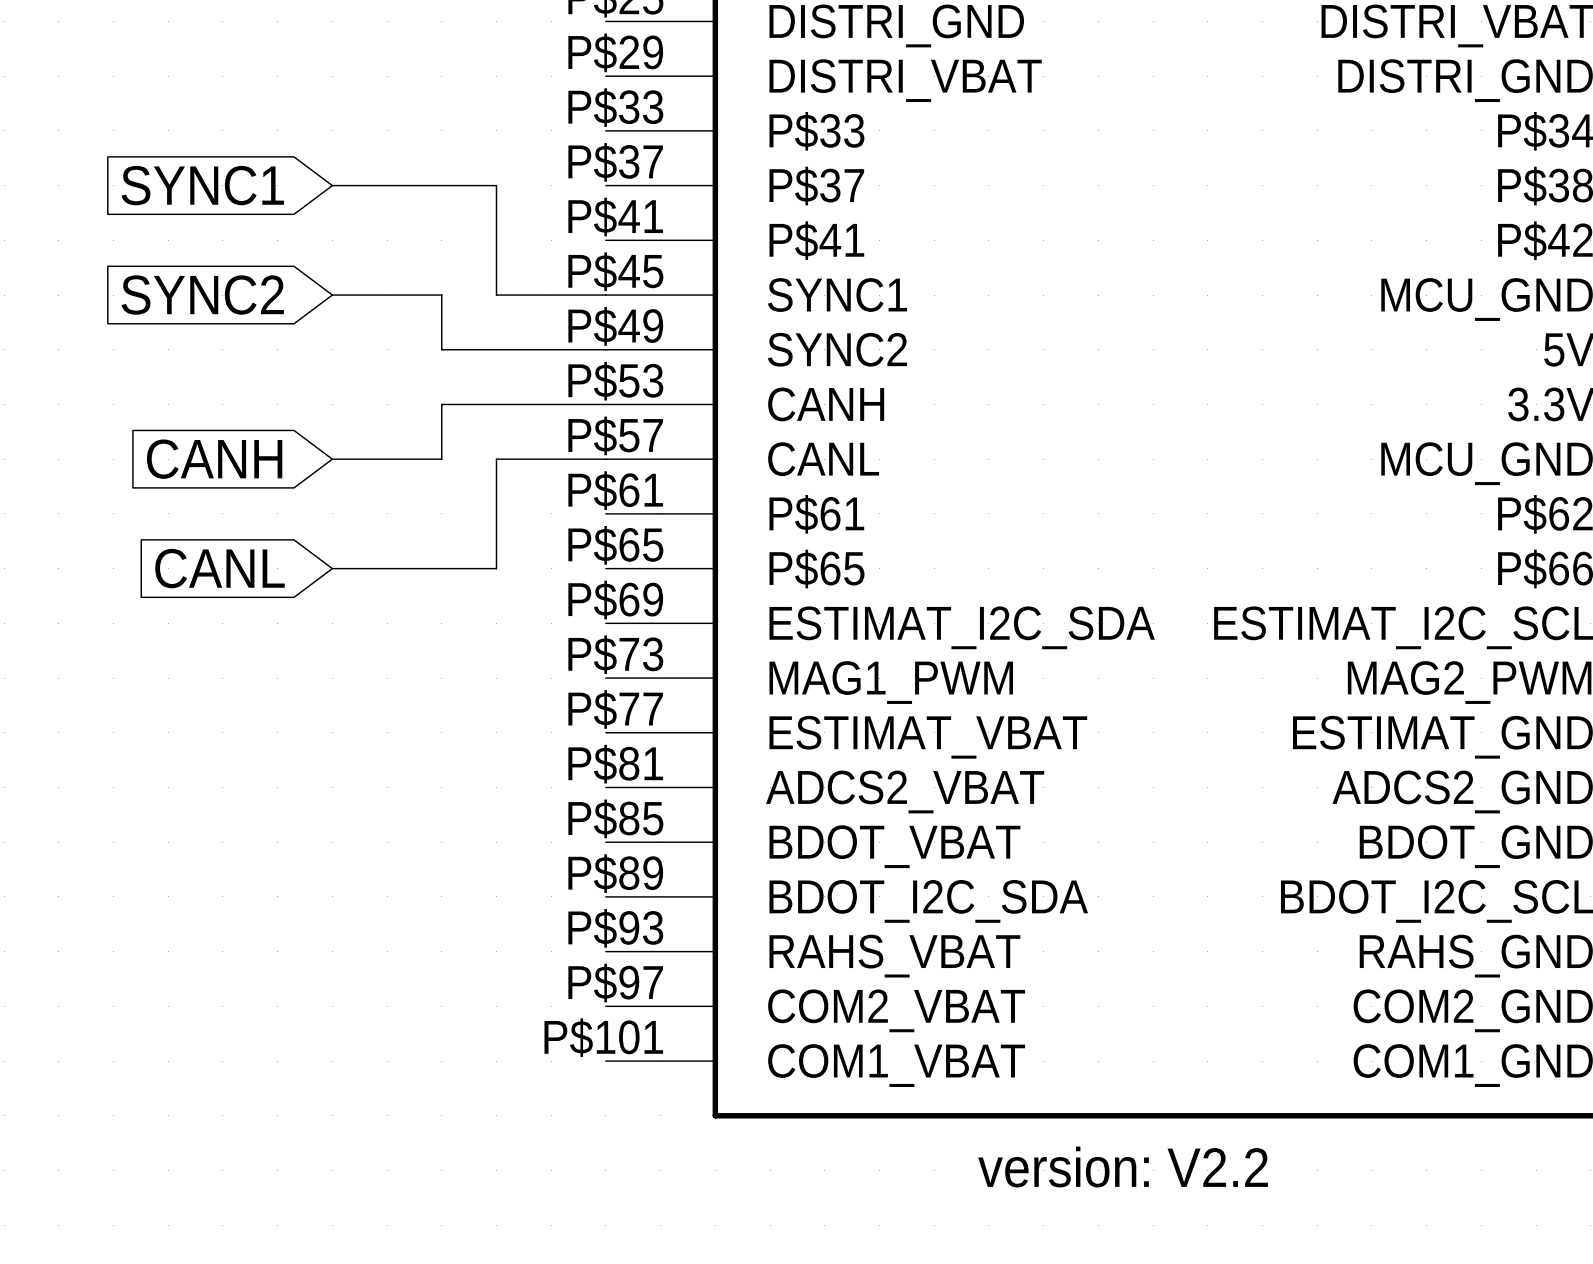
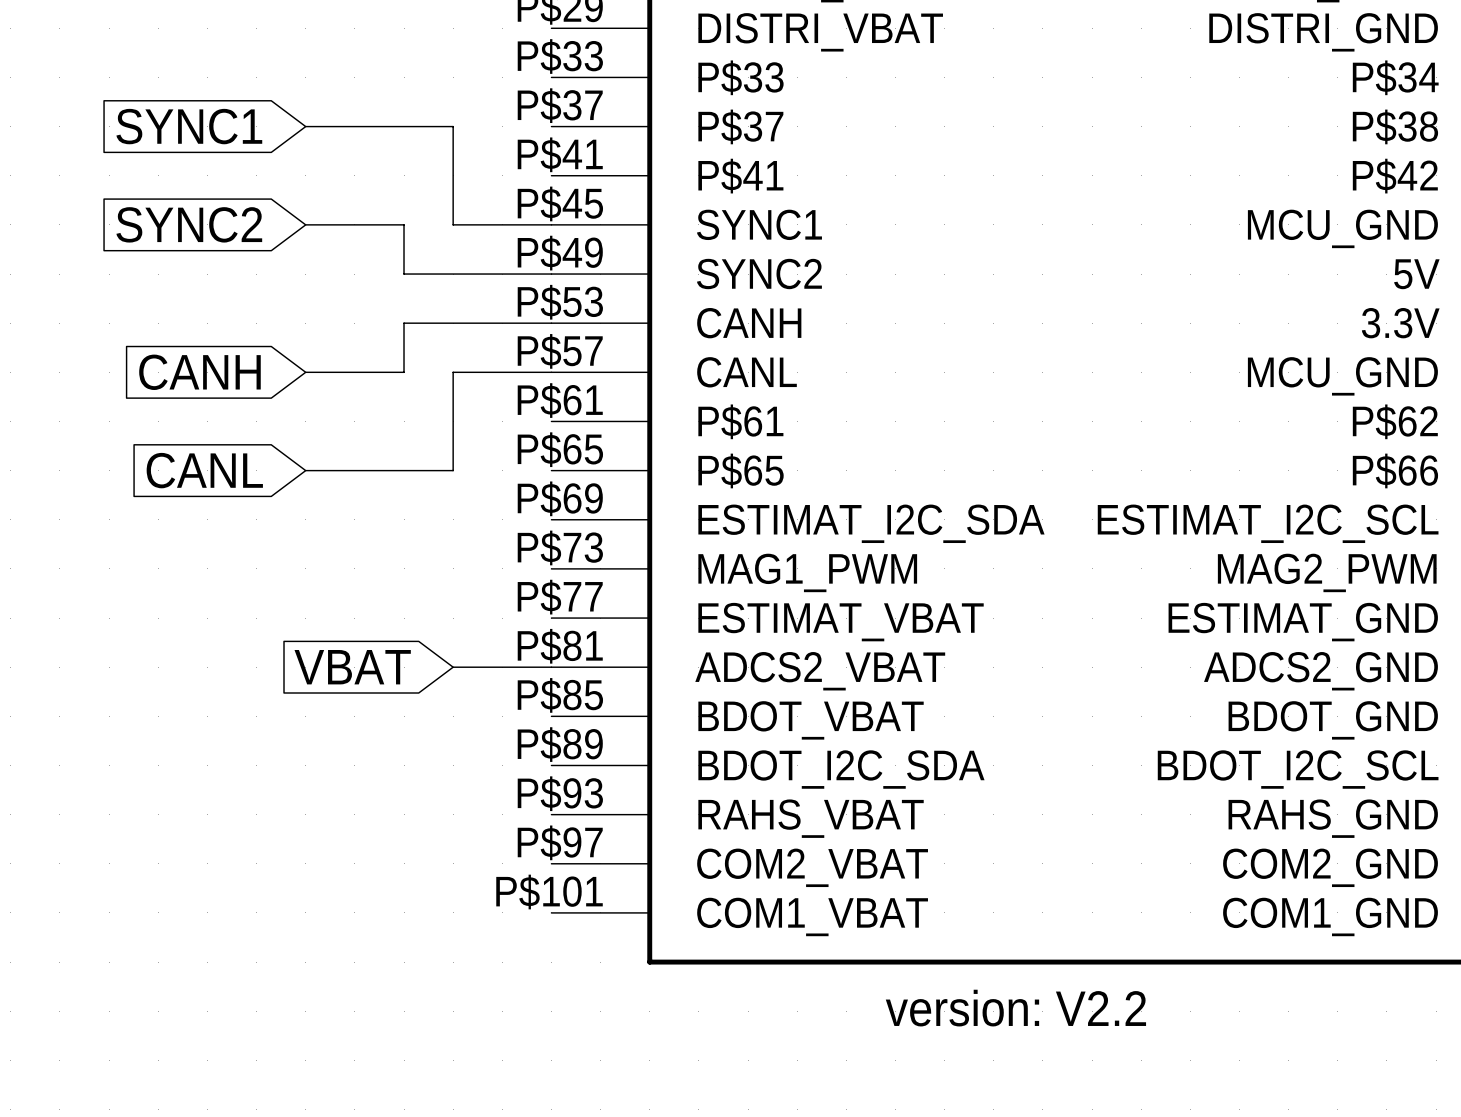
global label: none -> VBAT (352, 667)
wire: none -> (453, 667) (551, 667)

